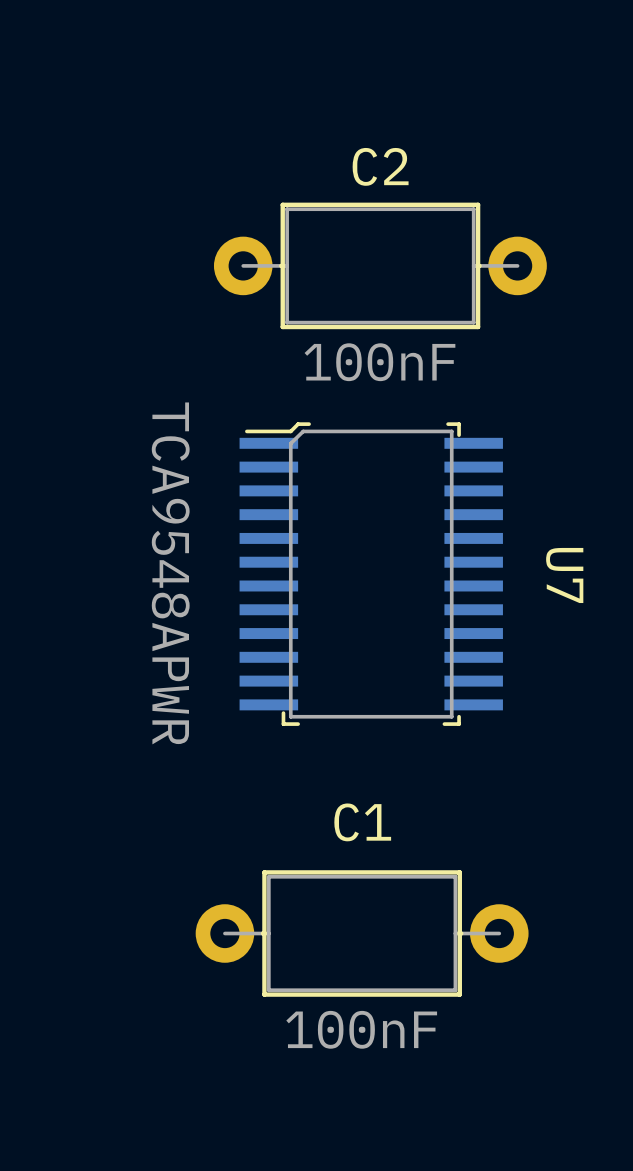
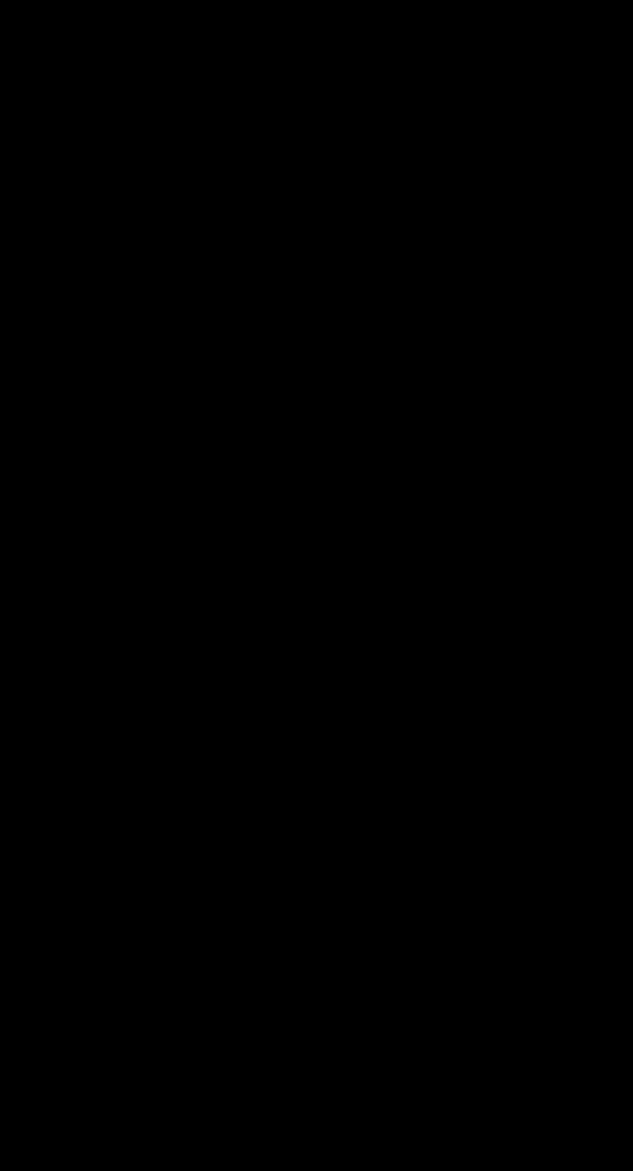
C2: 100nF (380, 265) -> none
U7: TCA9548APWR (371, 574) -> none
C1: 100nF (362, 933) -> none

